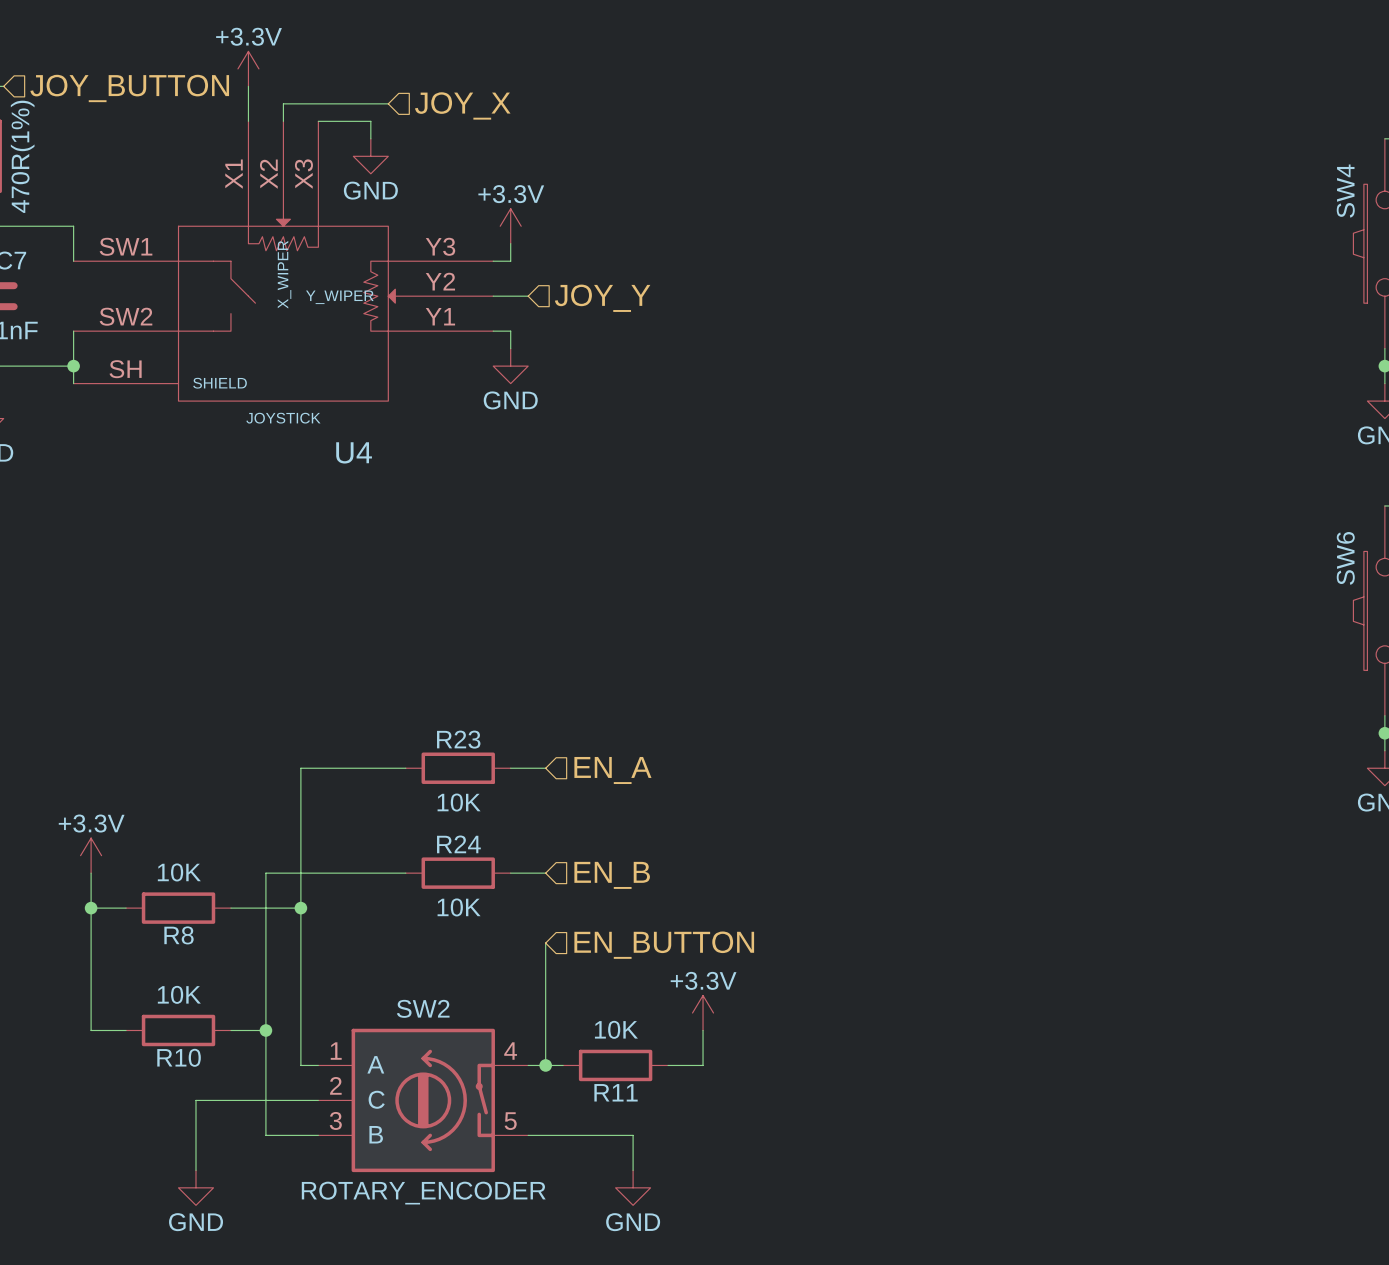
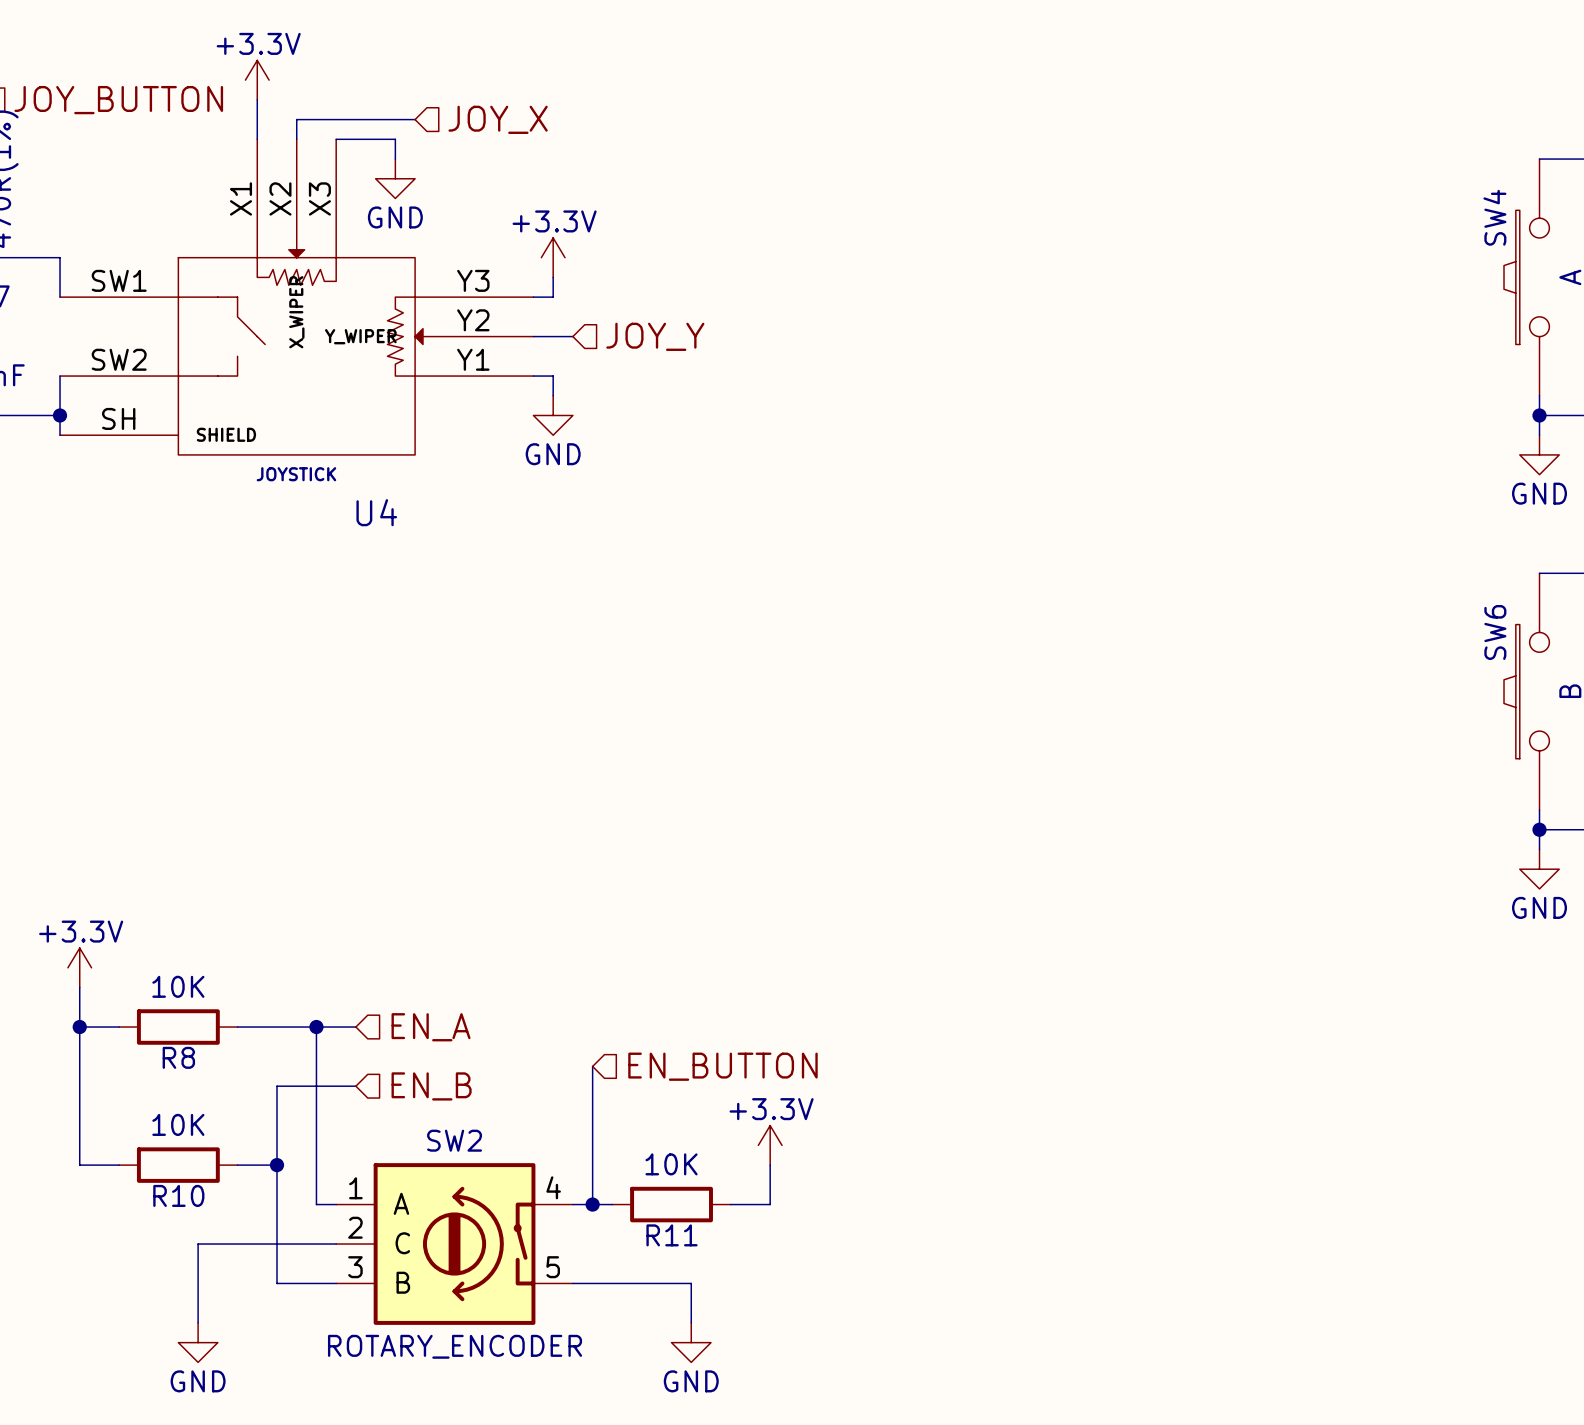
wire: (405, 768) (300, 768) (300, 908) -> (355, 1027) (316, 1027)
R23: 10K (458, 768) -> none
wire: (510, 768) (545, 768) -> none
hierarchical label position: EN_A (612, 770) -> EN_A (431, 1027)
wire: (405, 873) (265, 873) (265, 960) -> (355, 1086) (277, 1086)
R24: 10K (458, 873) -> none
wire: (510, 873) (545, 873) -> none
hierarchical label position: EN_B (612, 875) -> EN_B (431, 1086)

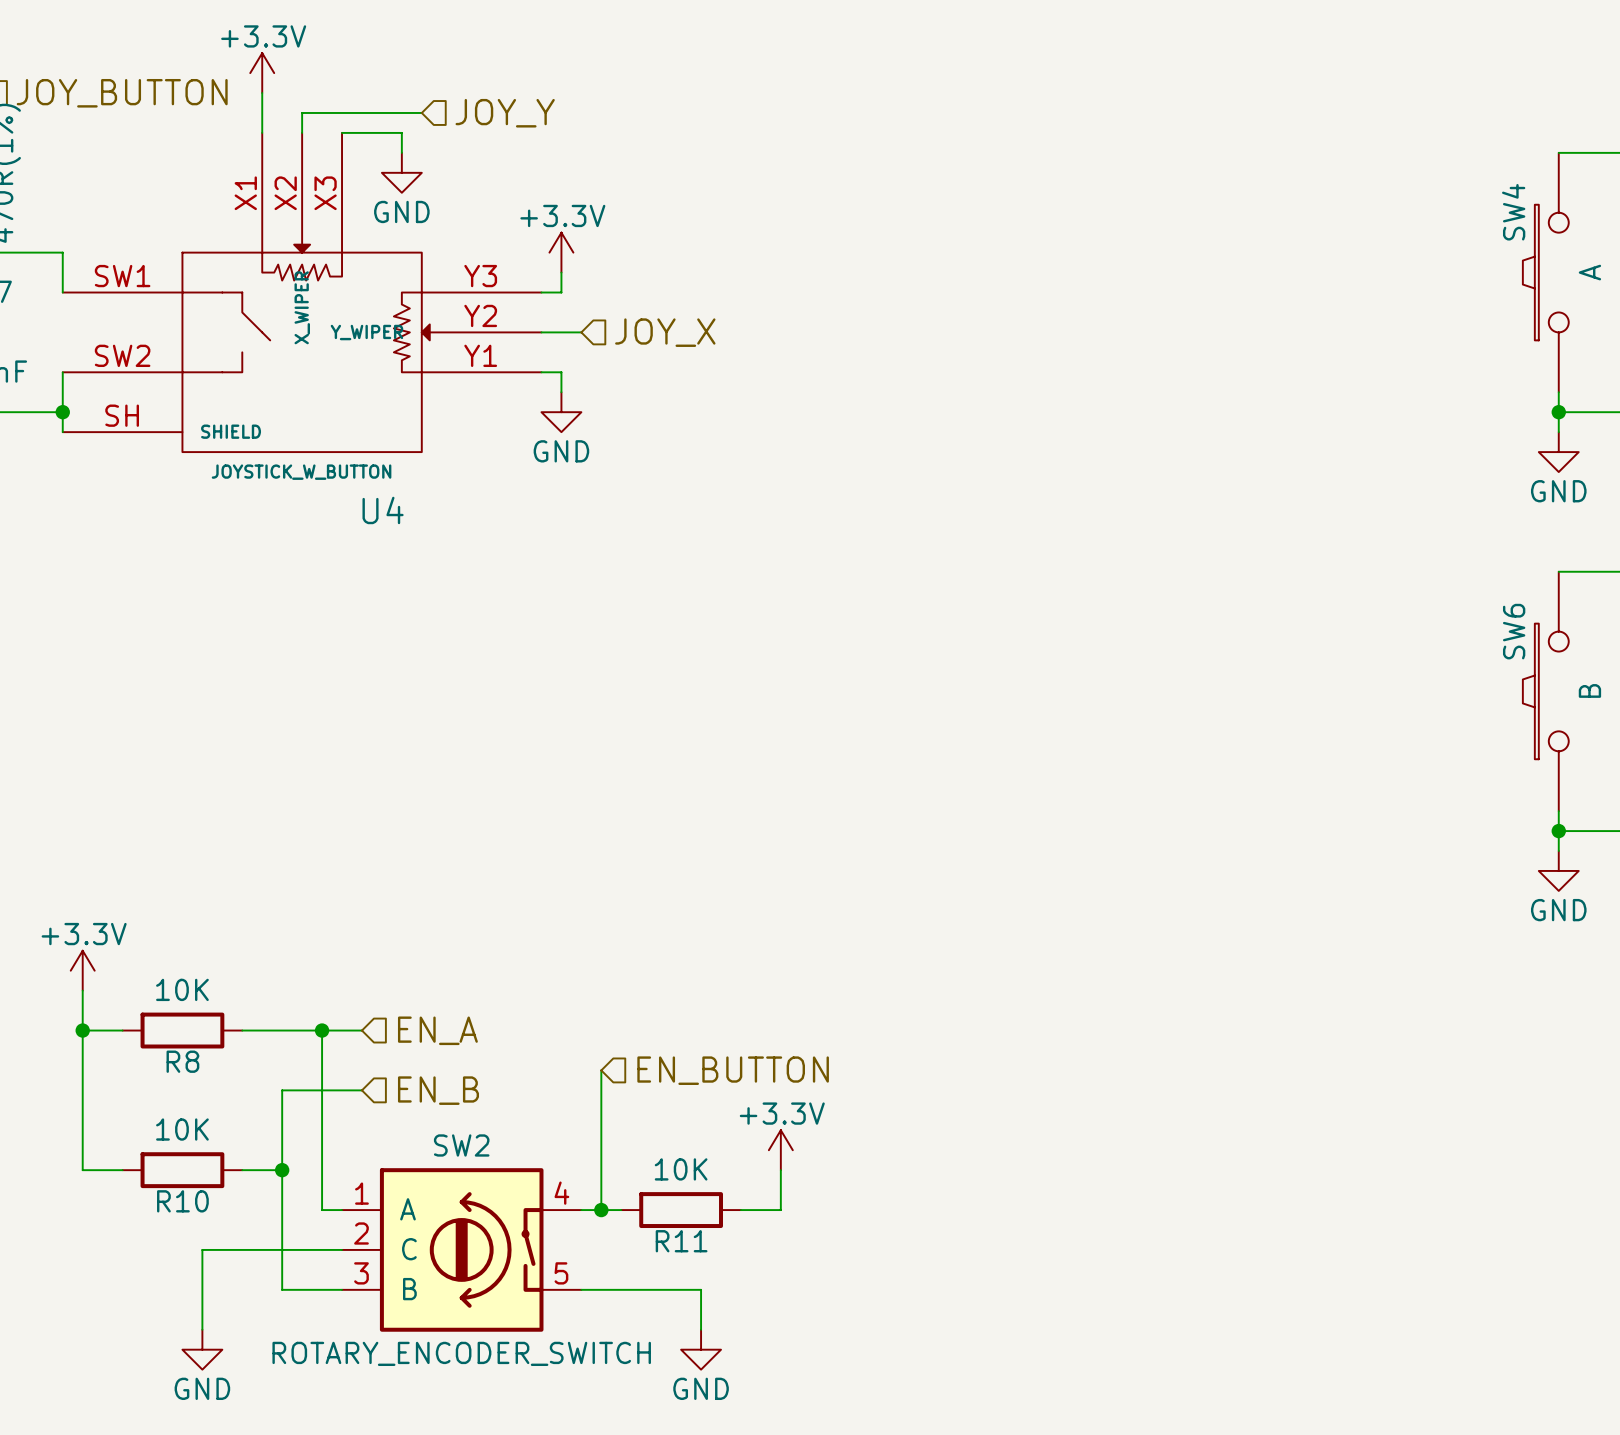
hierarchical label: JOY_X (498, 119) -> JOY_Y (505, 113)
hierarchical label: JOY_Y (655, 336) -> JOY_X (665, 332)
U4 value: JOYSTICK (296, 474) -> JOYSTICK_W_BUTTON (301, 472)
SW2 value: ROTARY_ENCODER (455, 1346) -> ROTARY_ENCODER_SWITCH (461, 1353)

